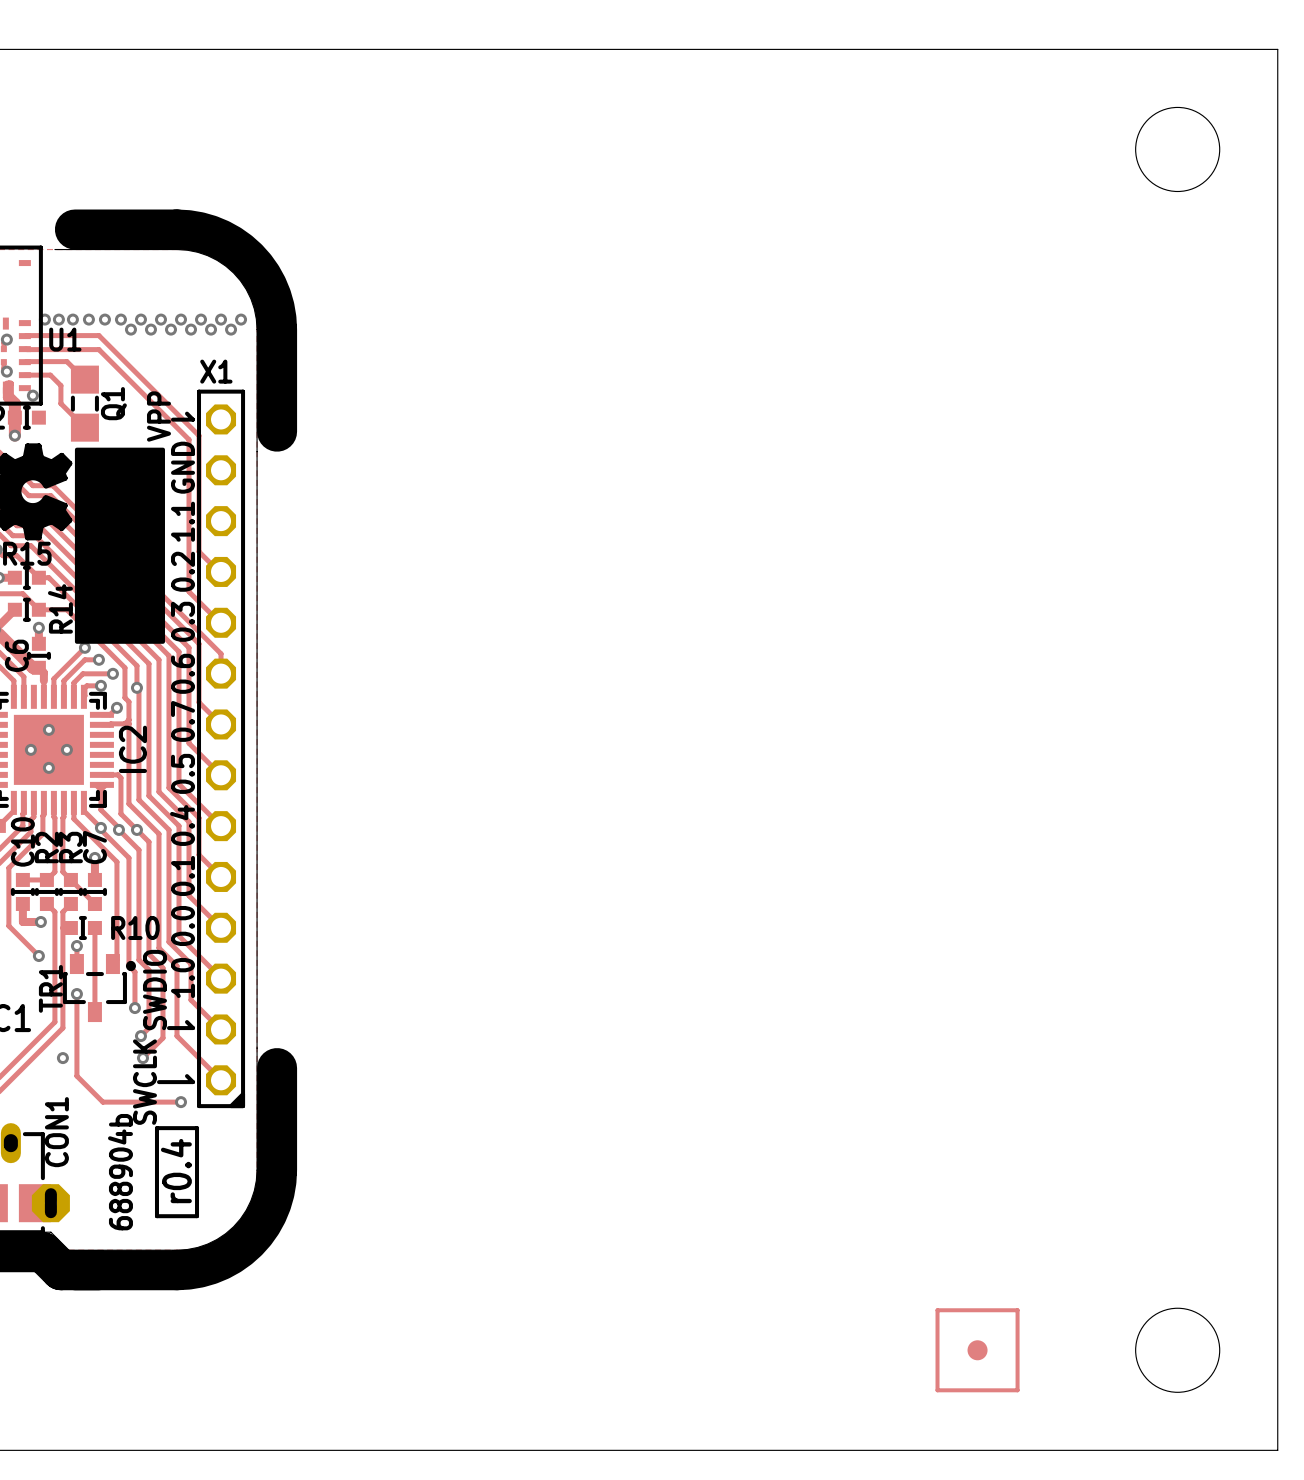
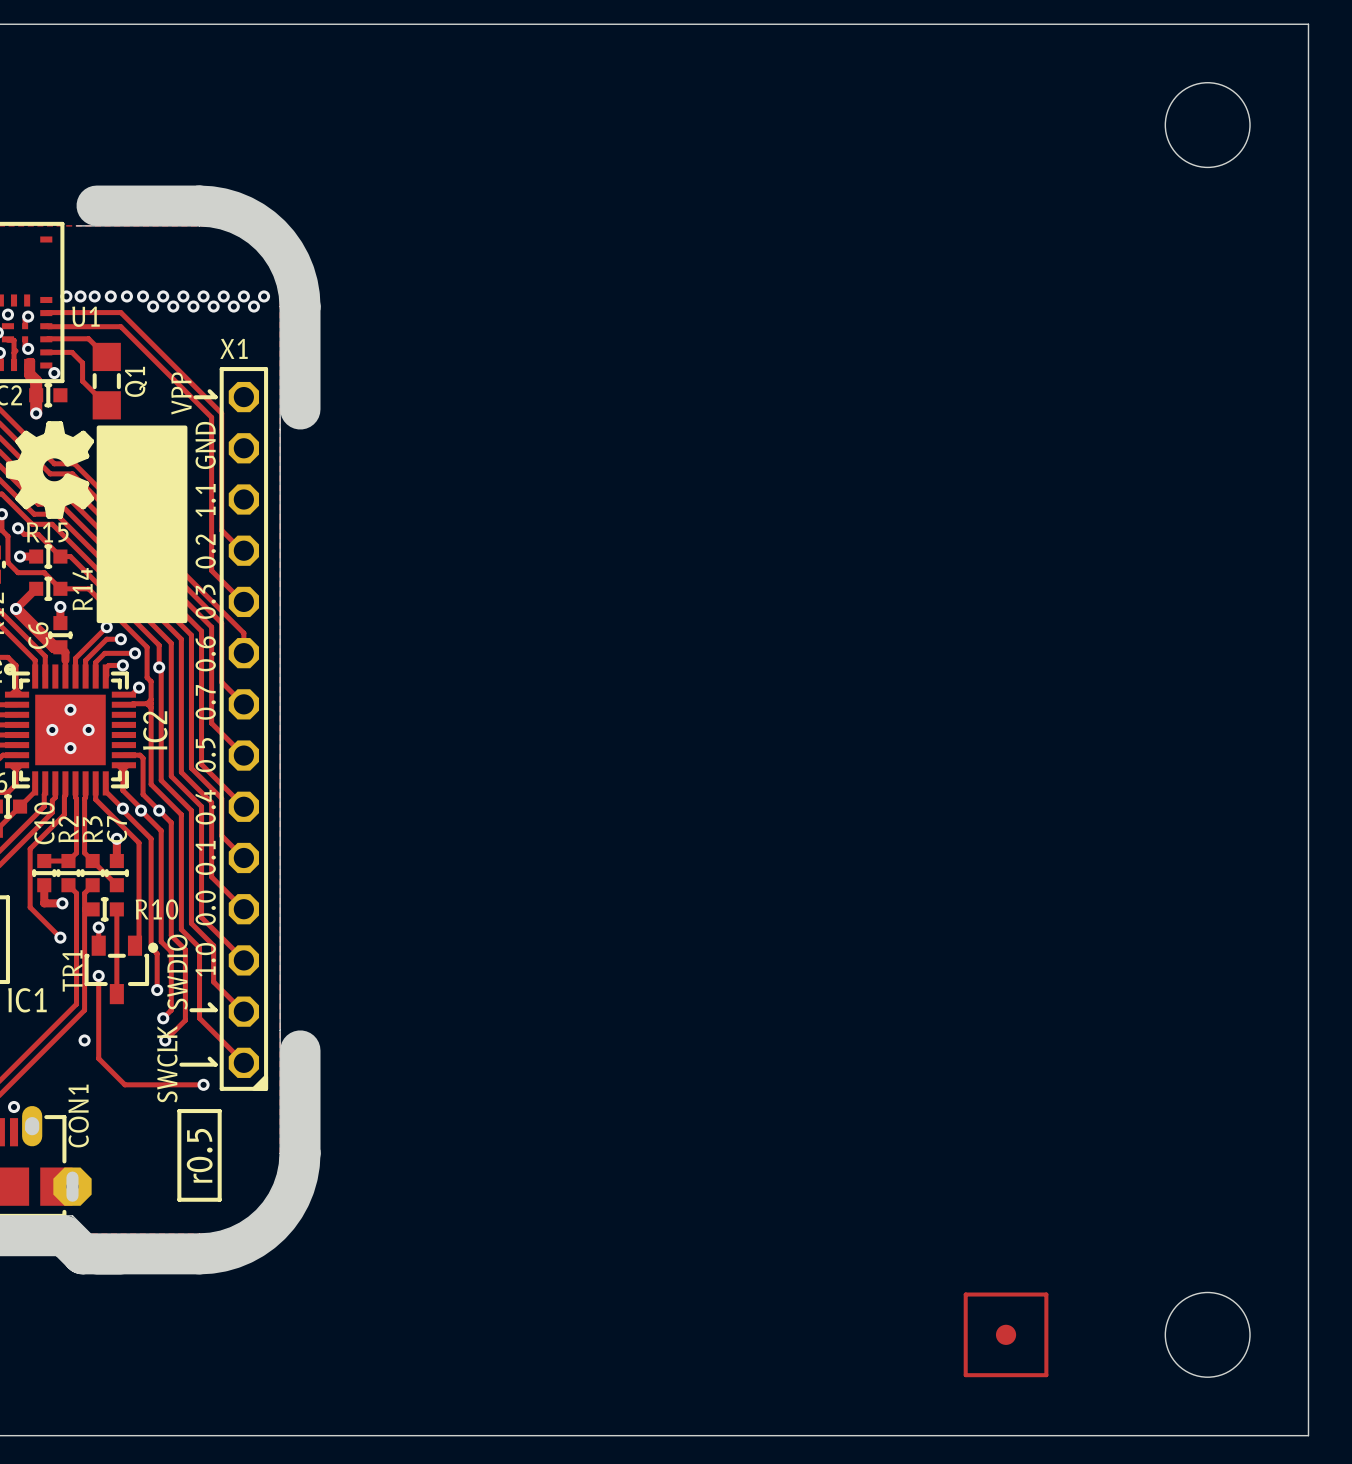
drawing: [107, 1113, 133, 1231] -> none
drawing shape: [154, 1126, 200, 1219] -> [177, 1109, 222, 1202]

